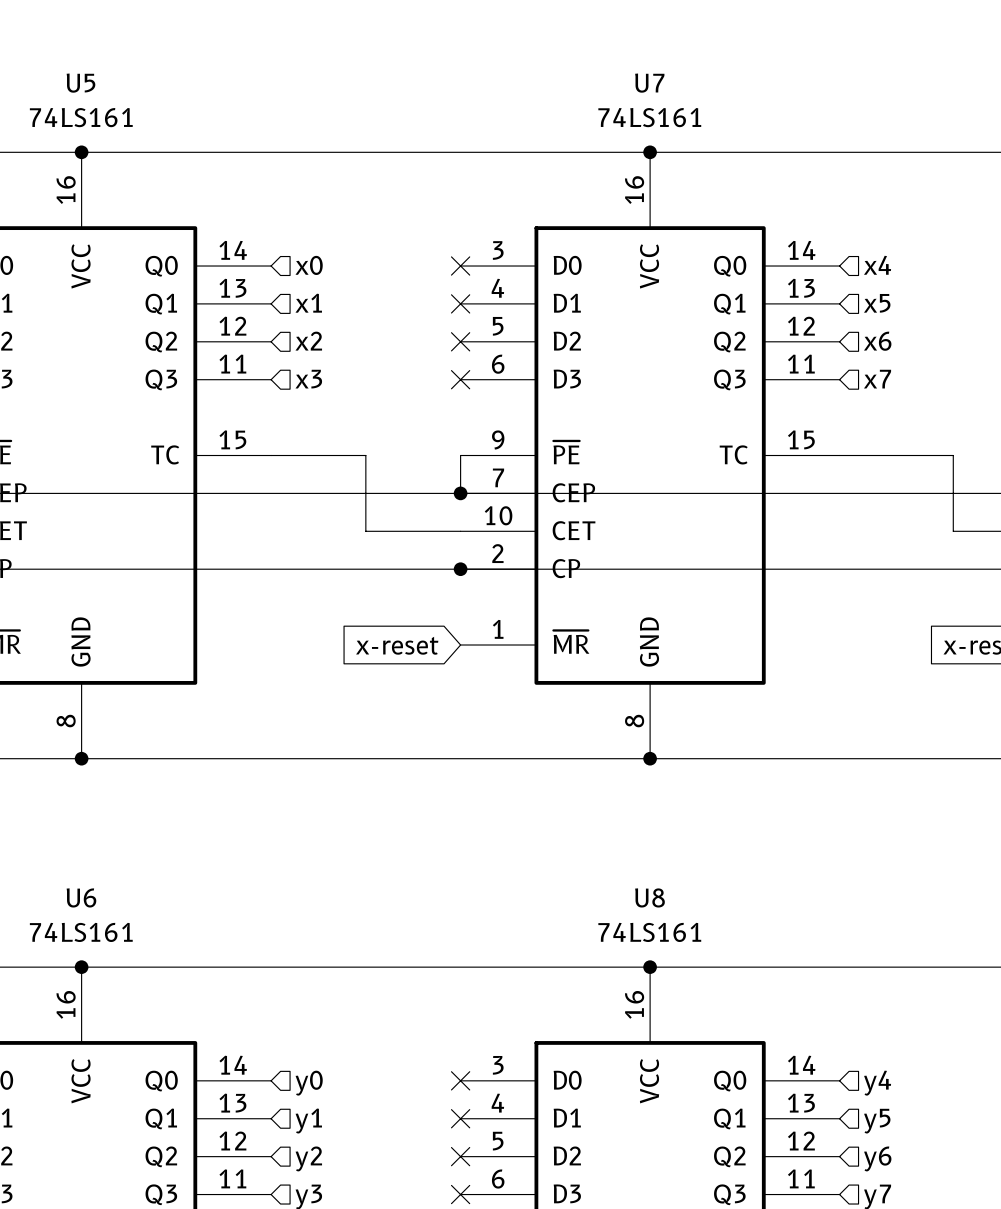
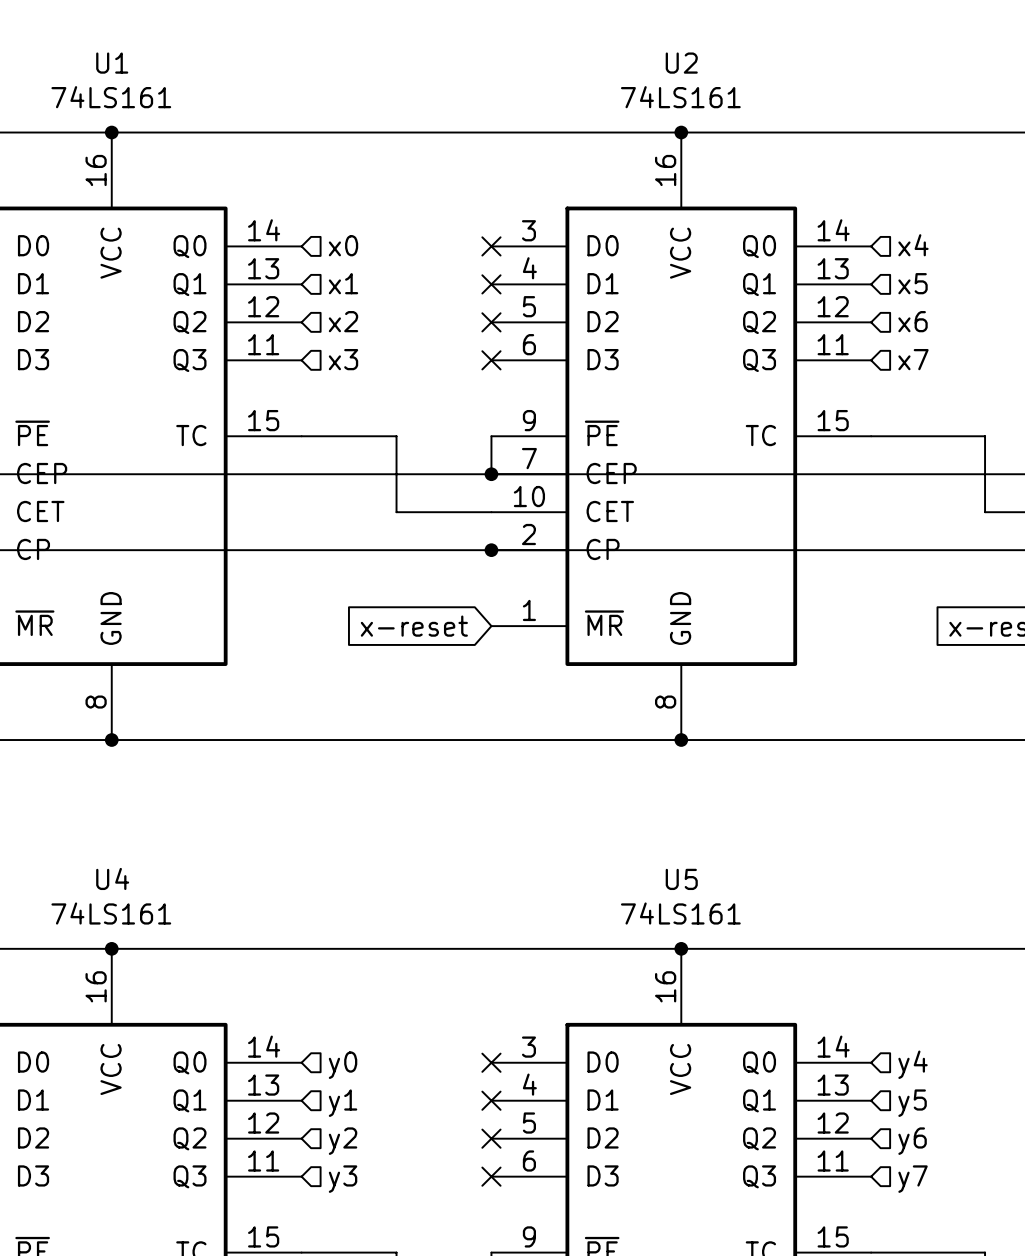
U5 name: U5 (80, 83) -> U1 (112, 63)
U7 name: U7 (649, 83) -> U2 (681, 63)
U6 name: U6 (81, 897) -> U4 (112, 878)
U8 name: U8 (649, 897) -> U5 (681, 879)

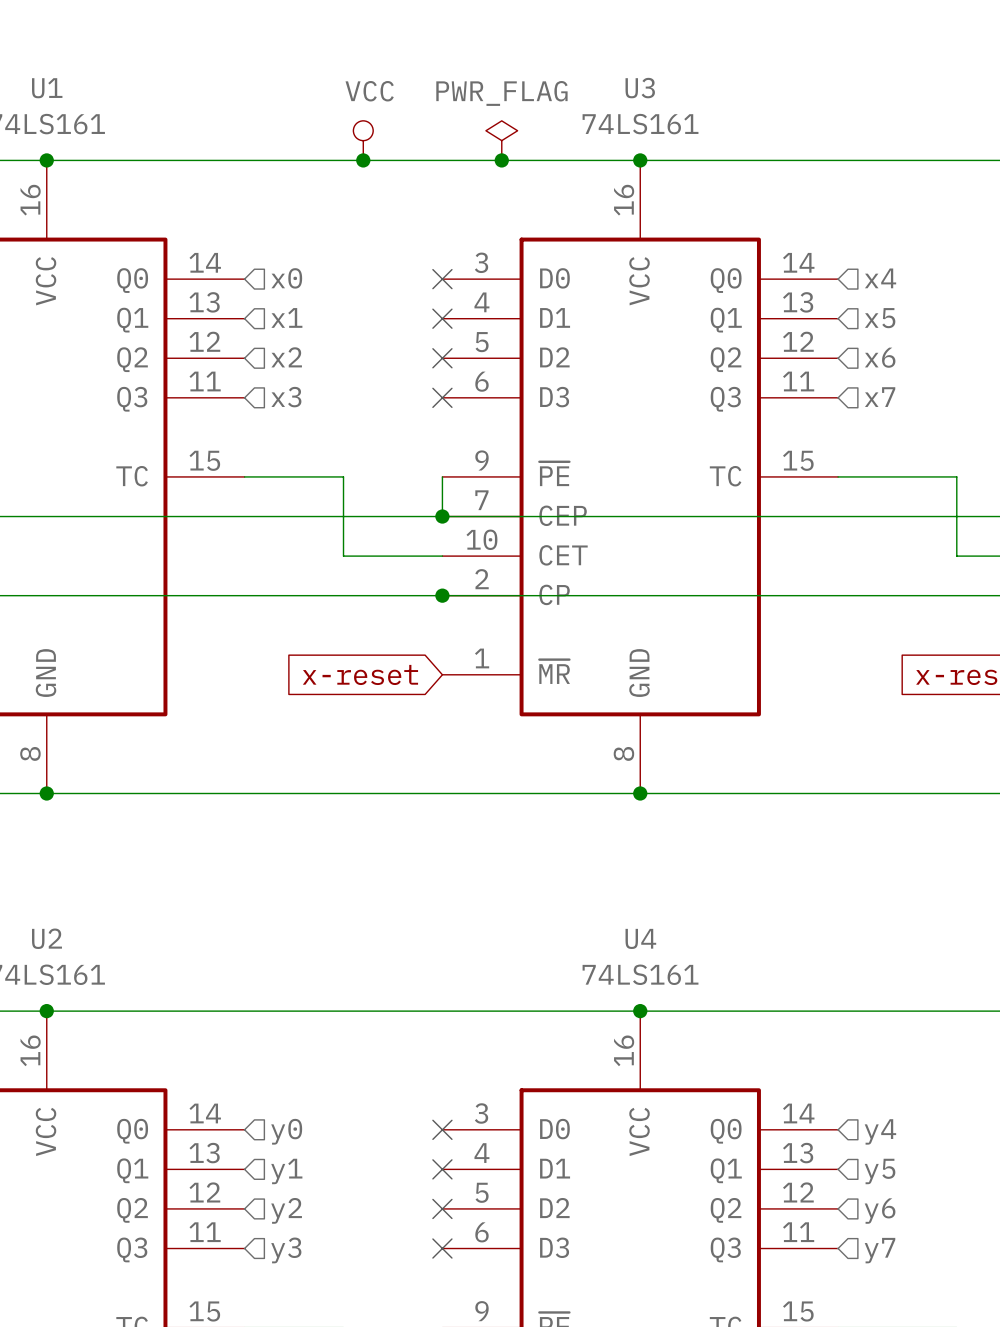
U2 name: U2 (681, 63) -> U3 (640, 88)
power symbol: none -> VCC (363, 140)
power symbol: none -> PWR_FLAG (501, 140)
junction: none -> (363, 160)
junction: none -> (501, 160)
U4 name: U4 (112, 878) -> U2 (46, 938)
U5 name: U5 (681, 879) -> U4 (640, 938)

